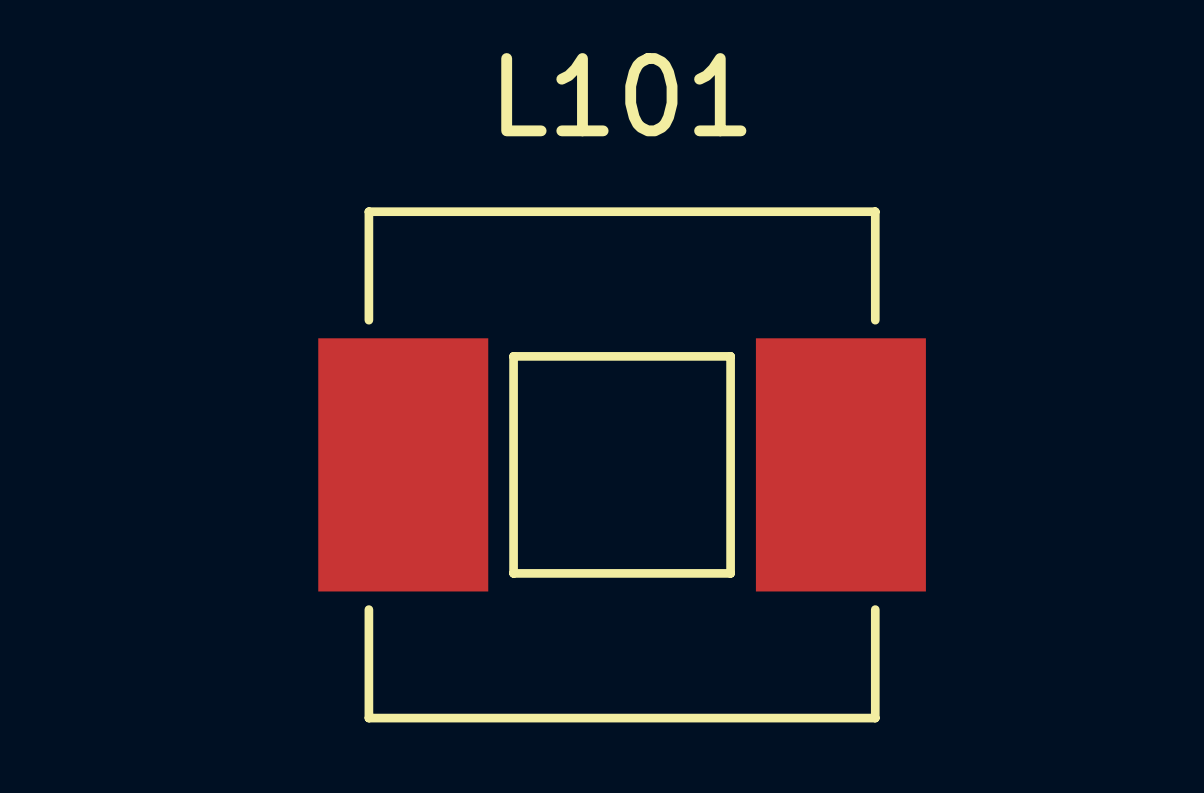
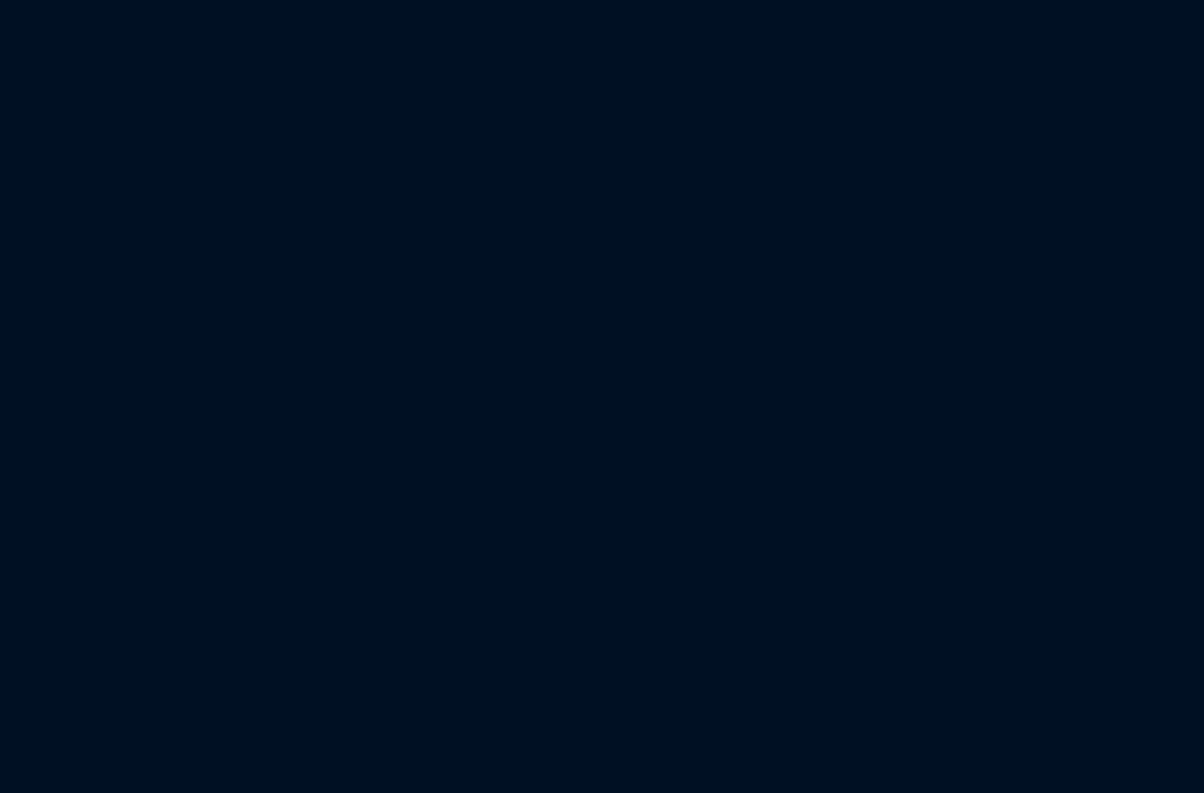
L101: (622, 464) -> none

